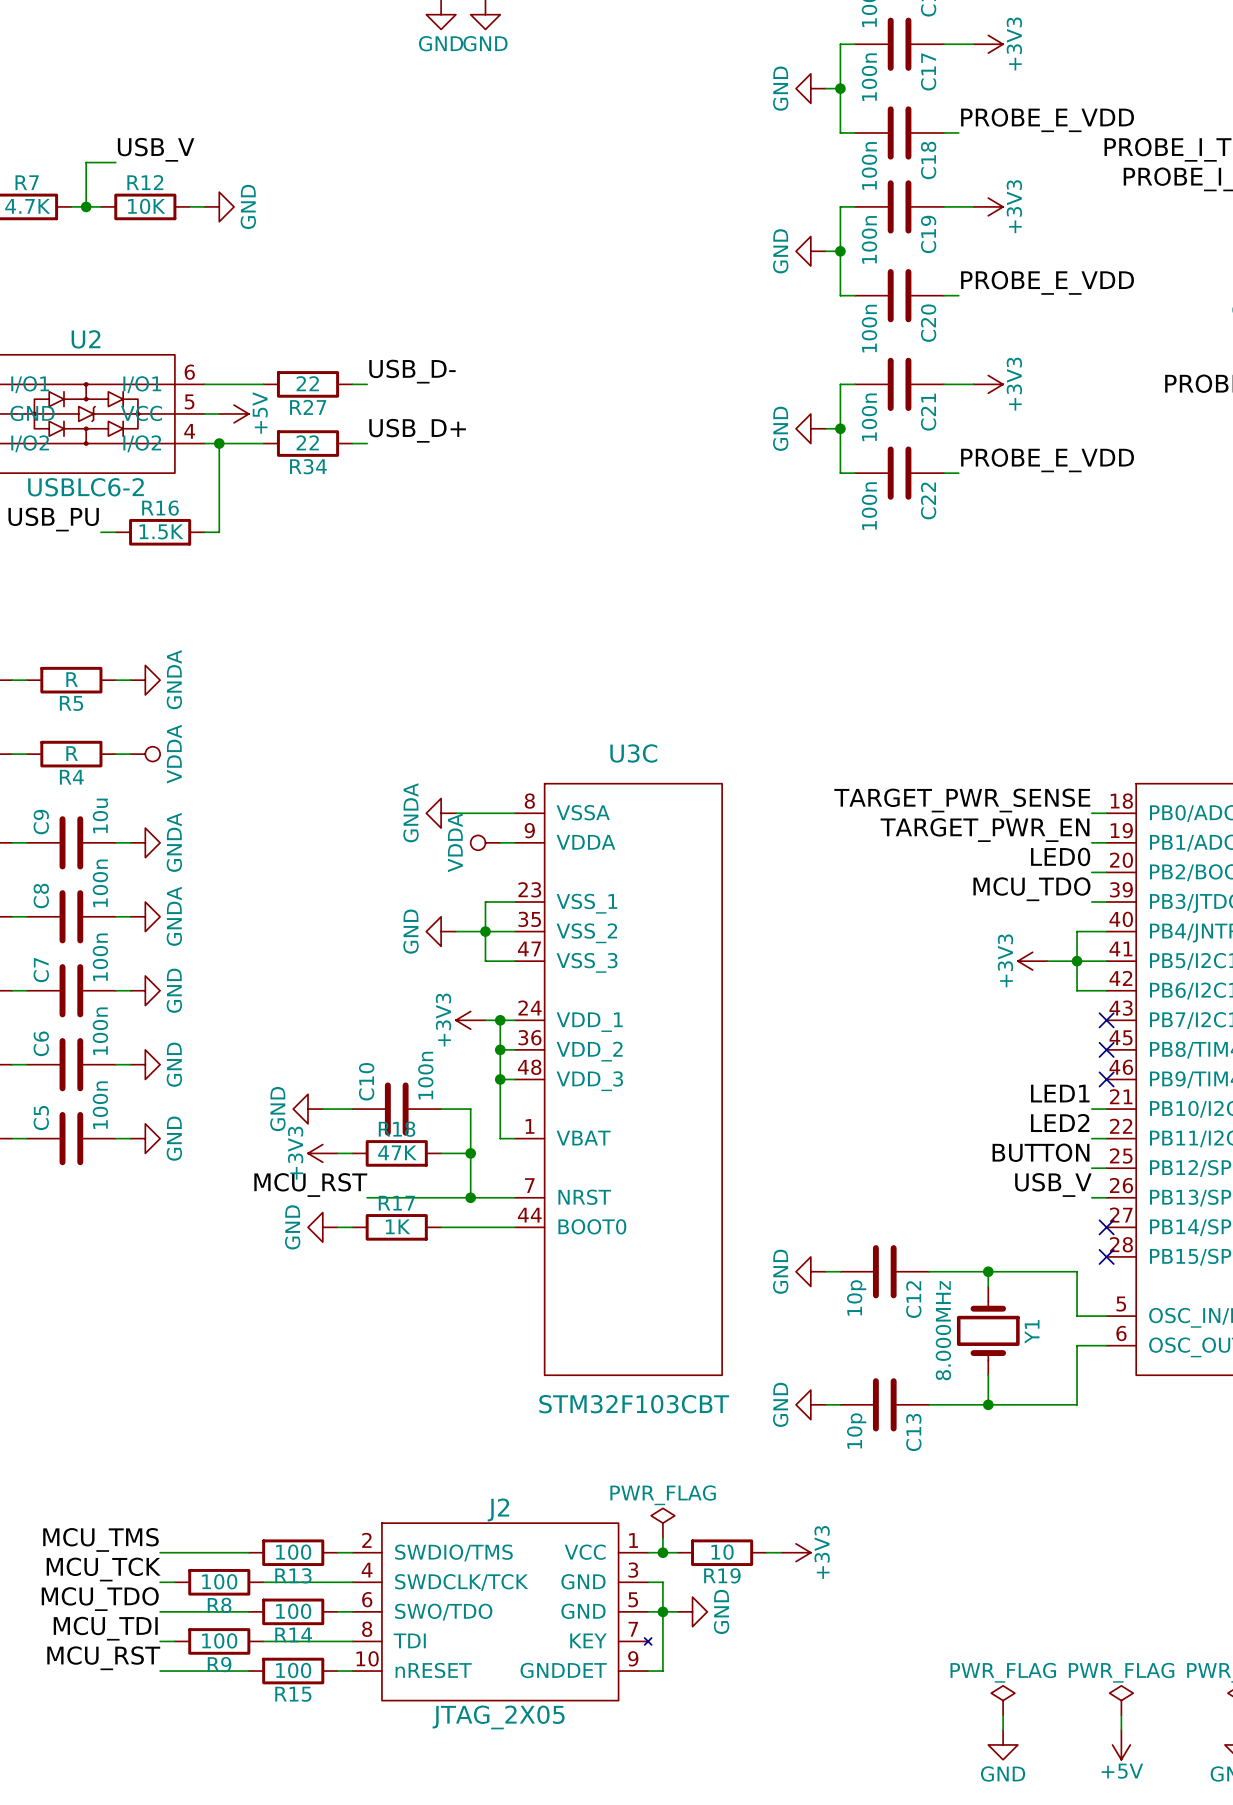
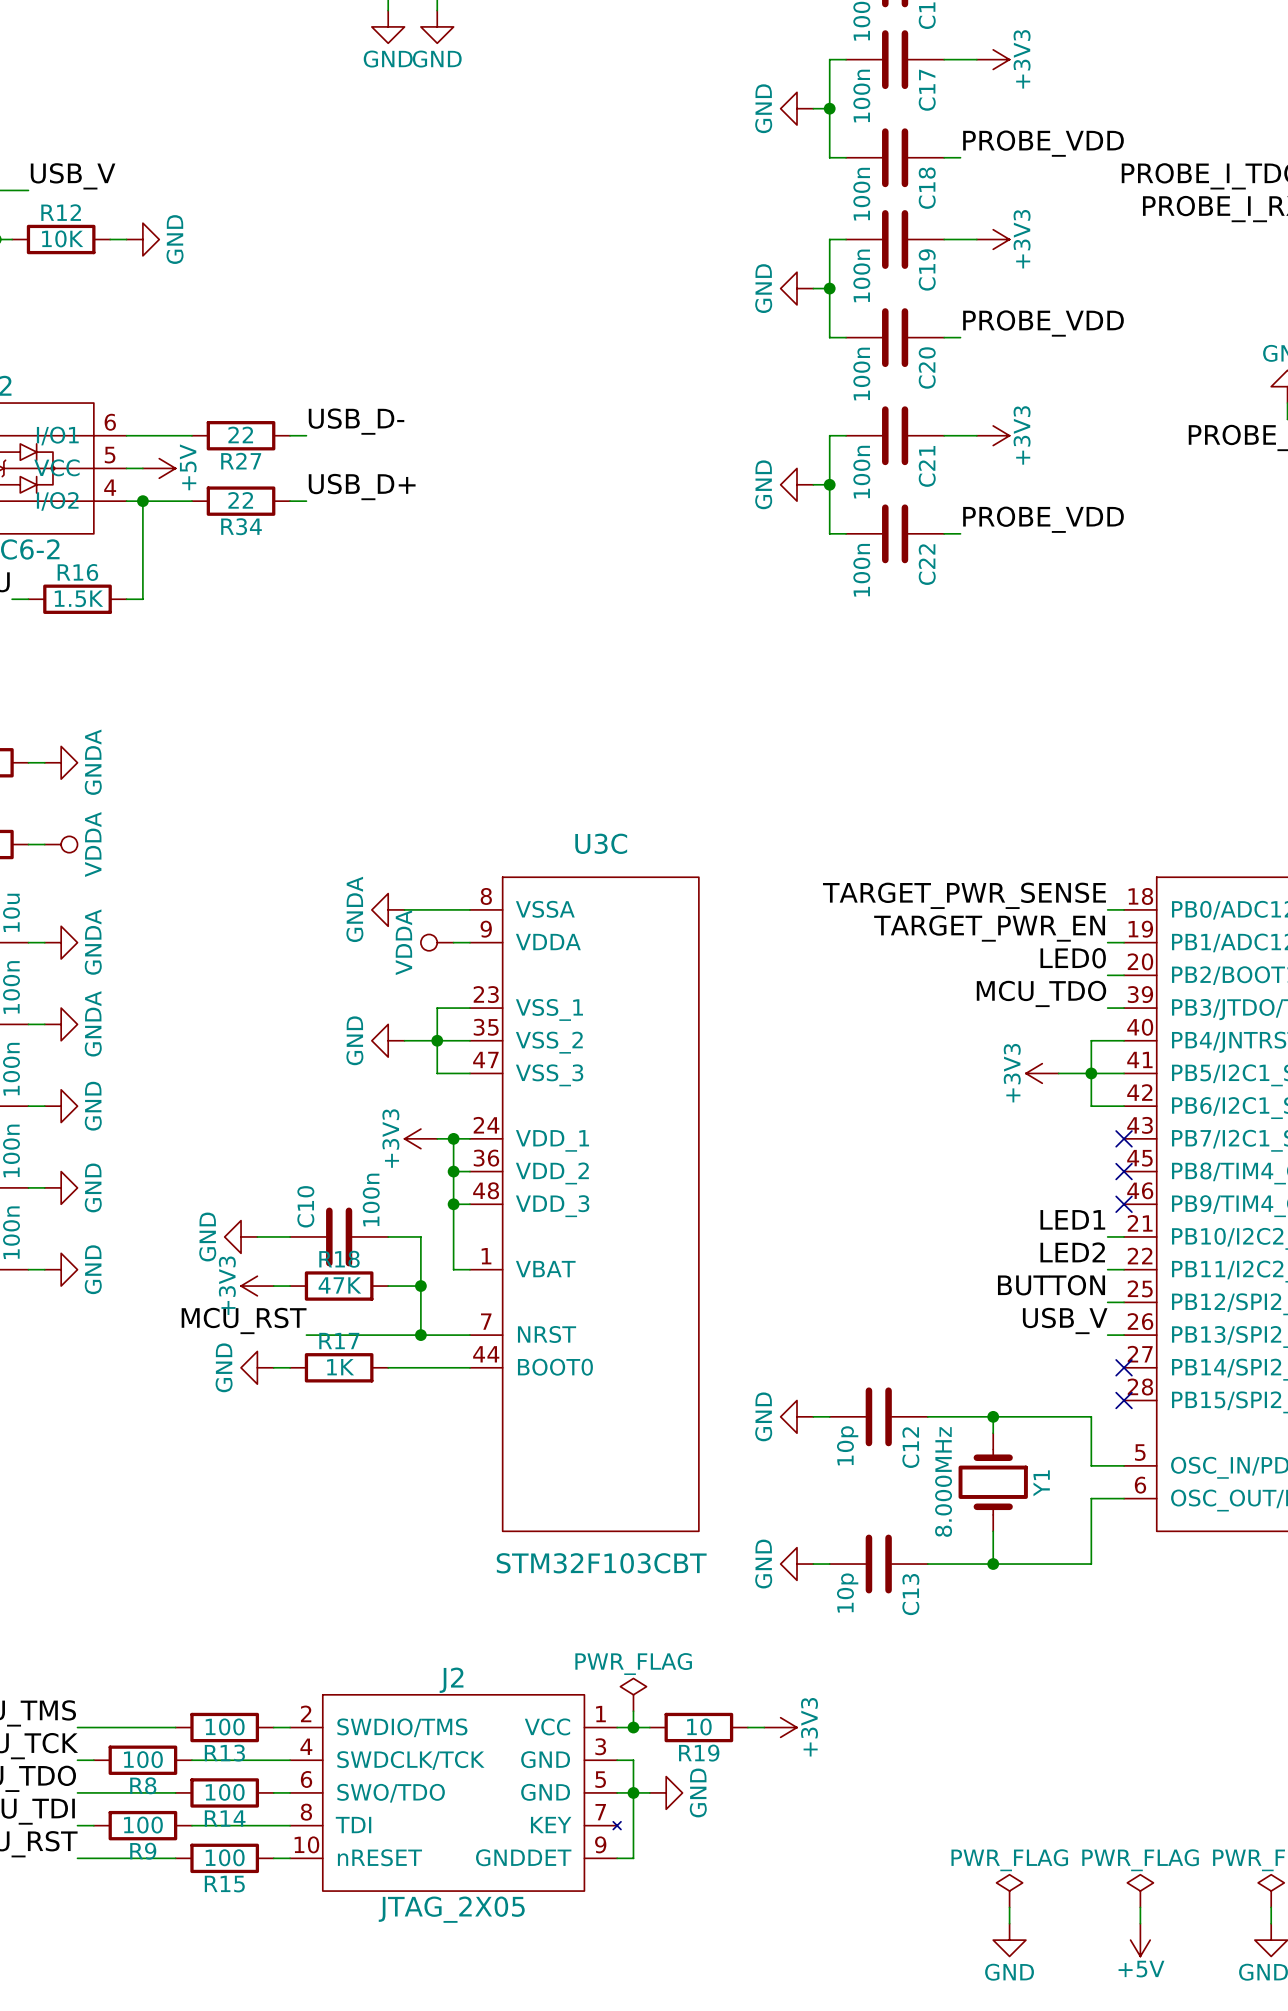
label: PROBE_E_VDD (1047, 120) -> PROBE_VDD (1043, 143)
label: PROBE_E_VDD (1047, 282) -> PROBE_VDD (1043, 323)
label: PROBE_E_VDD (1047, 460) -> PROBE_VDD (1043, 519)

